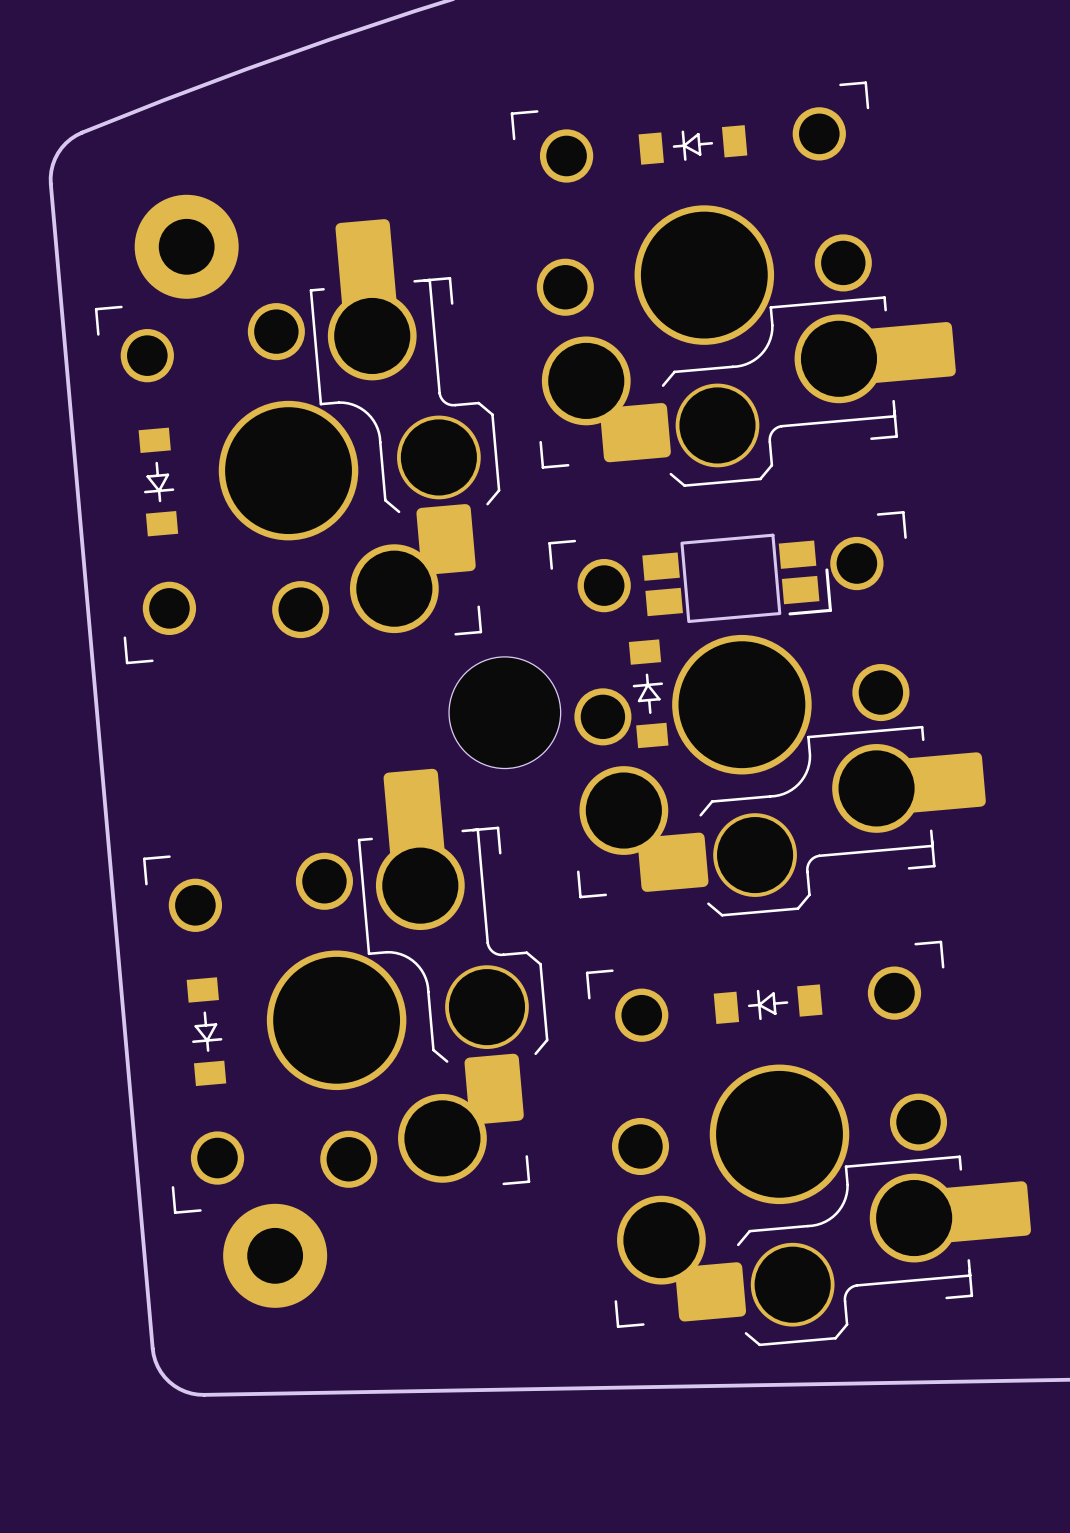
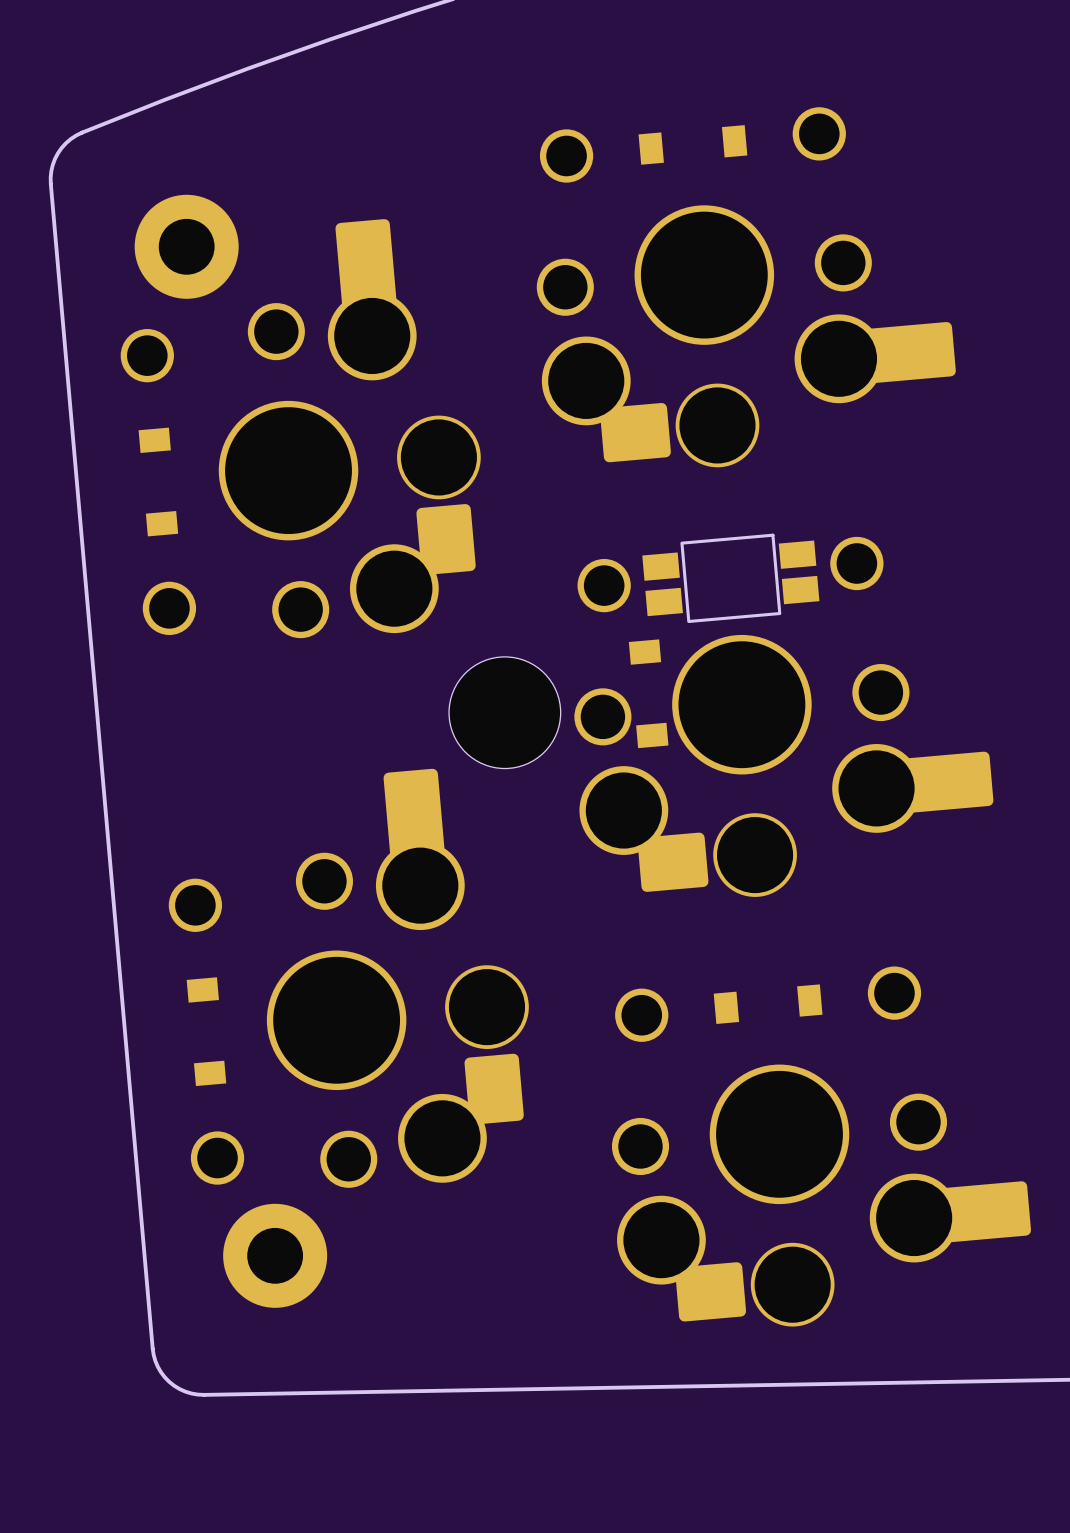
part footprint: [510, 81, 956, 487] -> [536, 107, 956, 468]
part footprint: [638, 125, 748, 165] -> [638, 125, 748, 165]
part footprint: [94, 219, 501, 665] -> [120, 219, 481, 639]
part footprint: [138, 427, 179, 537] -> [138, 427, 179, 537]
part footprint: [548, 511, 986, 917] -> [574, 536, 994, 897]
part footprint: [642, 533, 832, 624] -> [642, 533, 820, 624]
part footprint: [628, 639, 669, 749] -> [628, 639, 669, 749]
part footprint: [142, 768, 549, 1214] -> [168, 768, 529, 1188]
part footprint: [585, 940, 1032, 1347] -> [611, 966, 1032, 1327]
part footprint: [186, 977, 227, 1087] -> [186, 977, 227, 1087]
part footprint: [713, 984, 823, 1024] -> [713, 984, 823, 1024]

